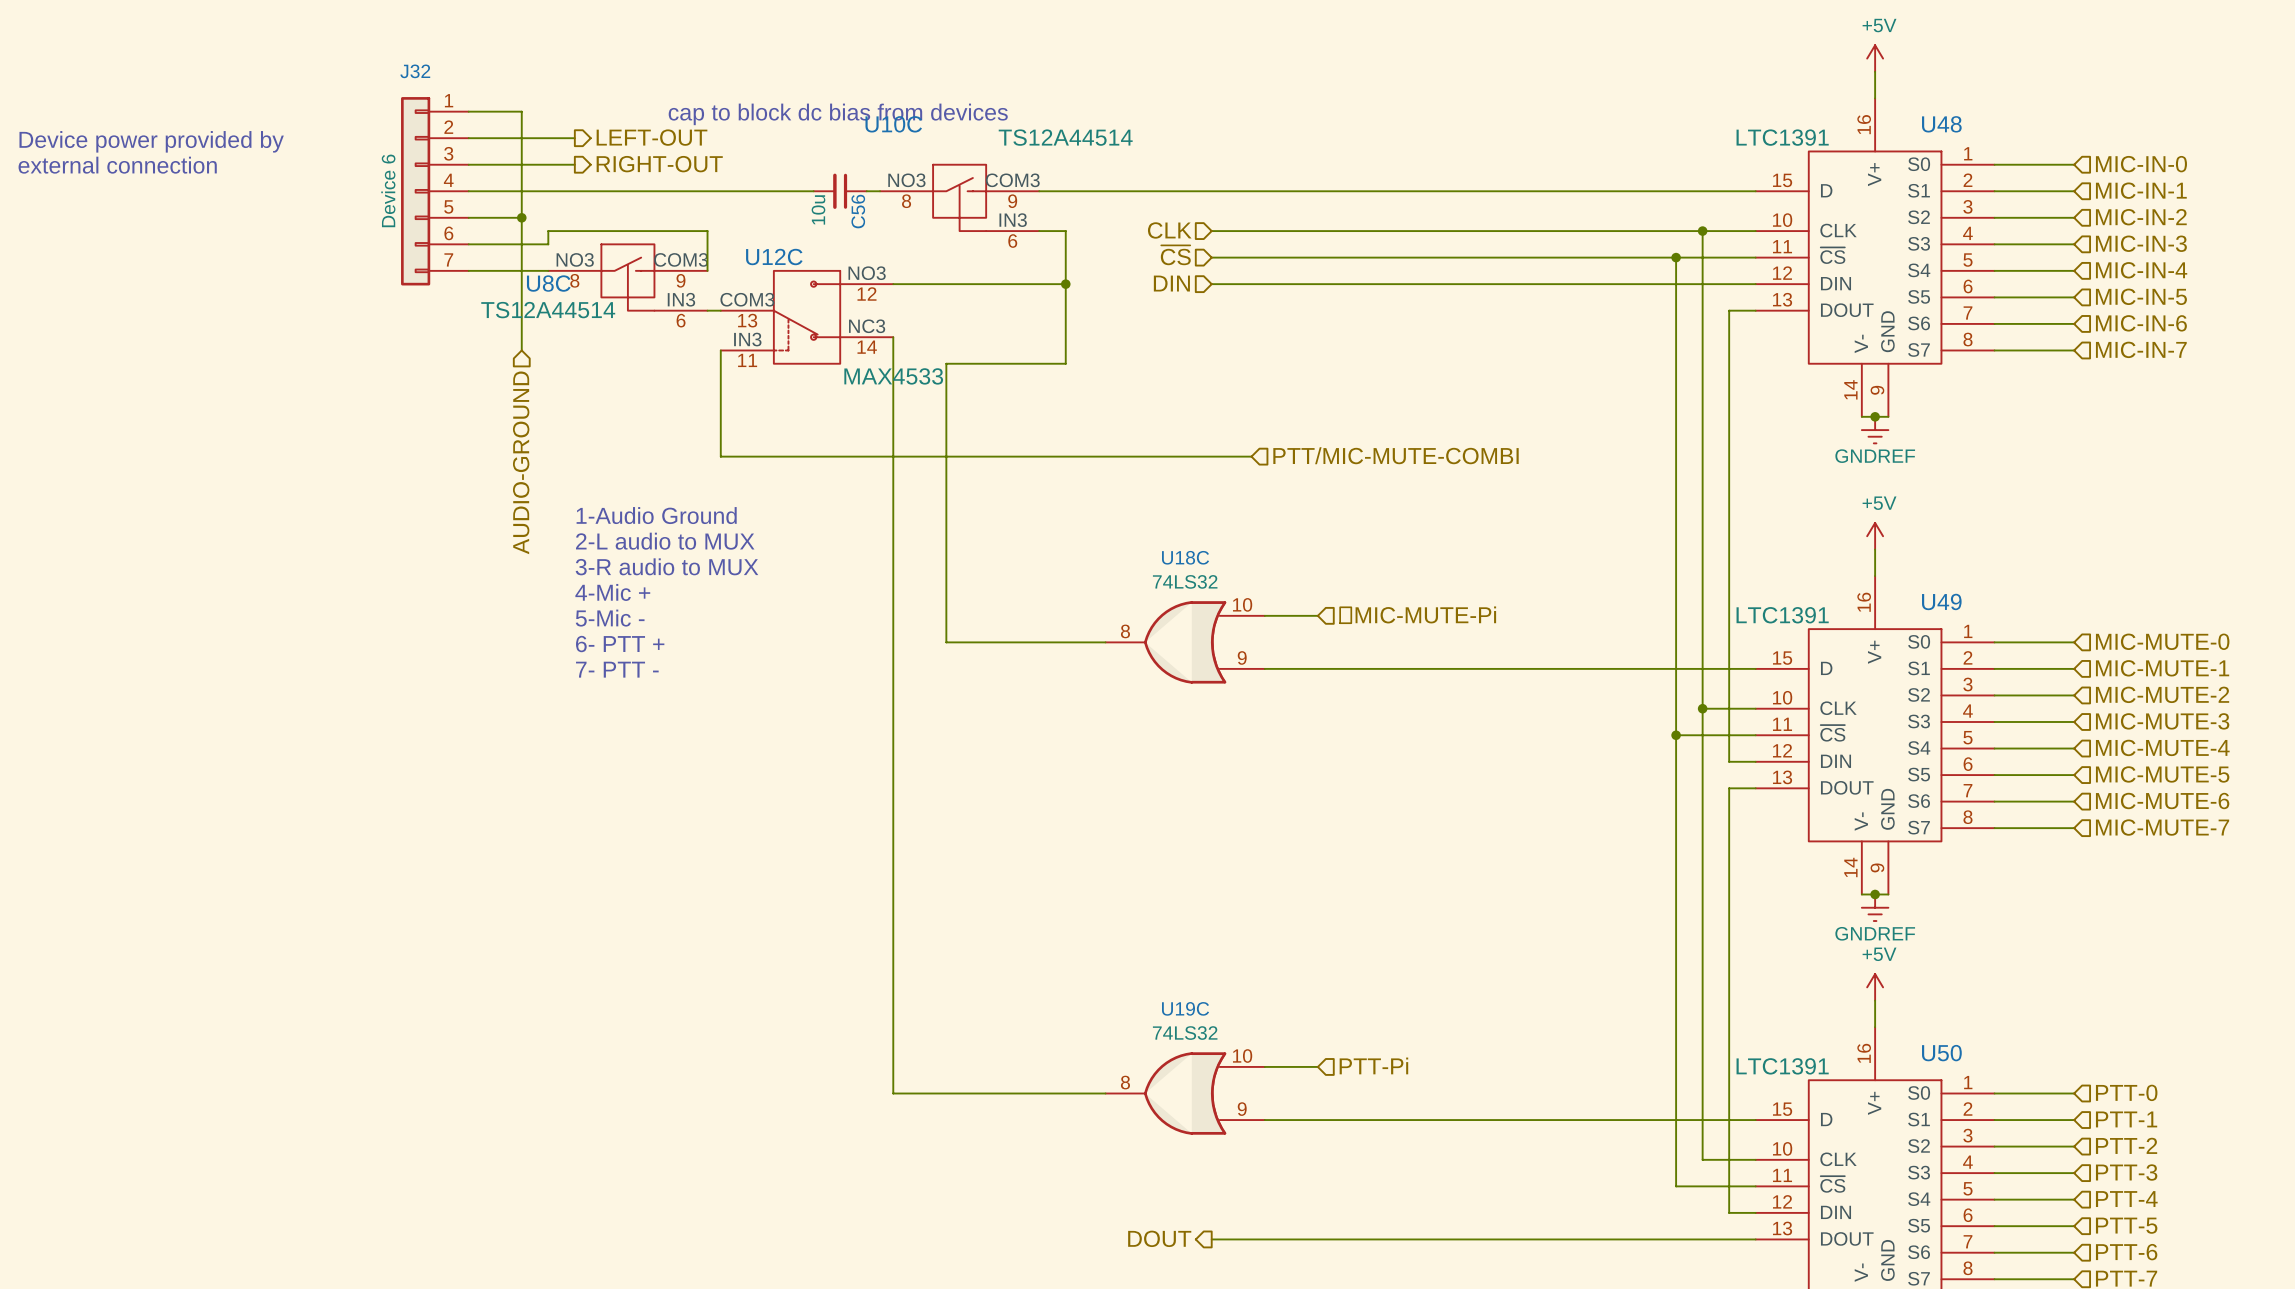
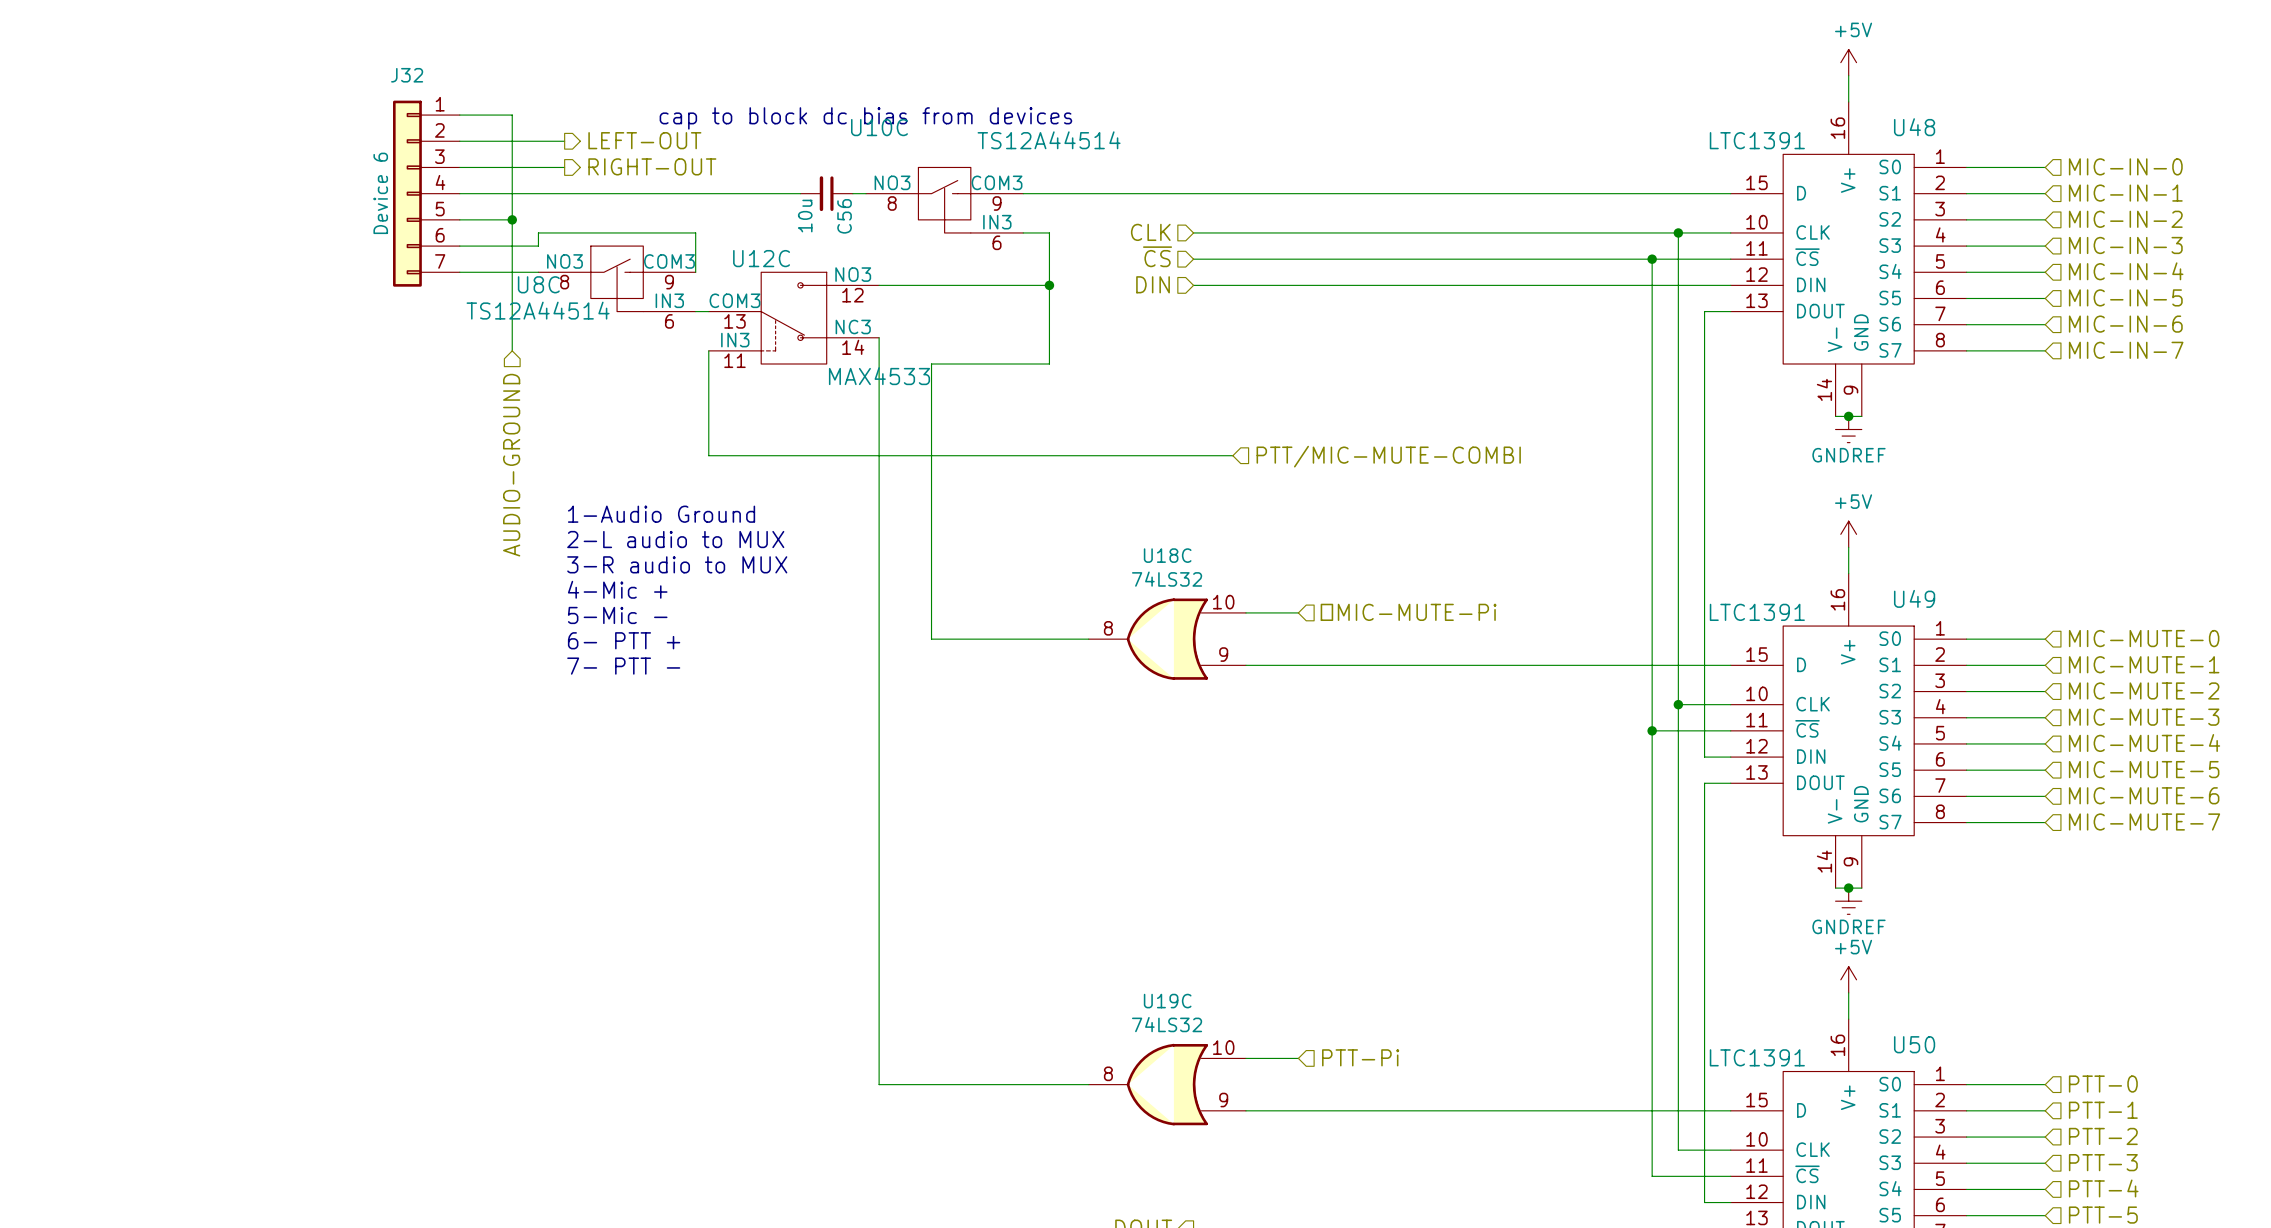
text: Device power provided by (151, 141) -> none
text: external connection (117, 165) -> none

